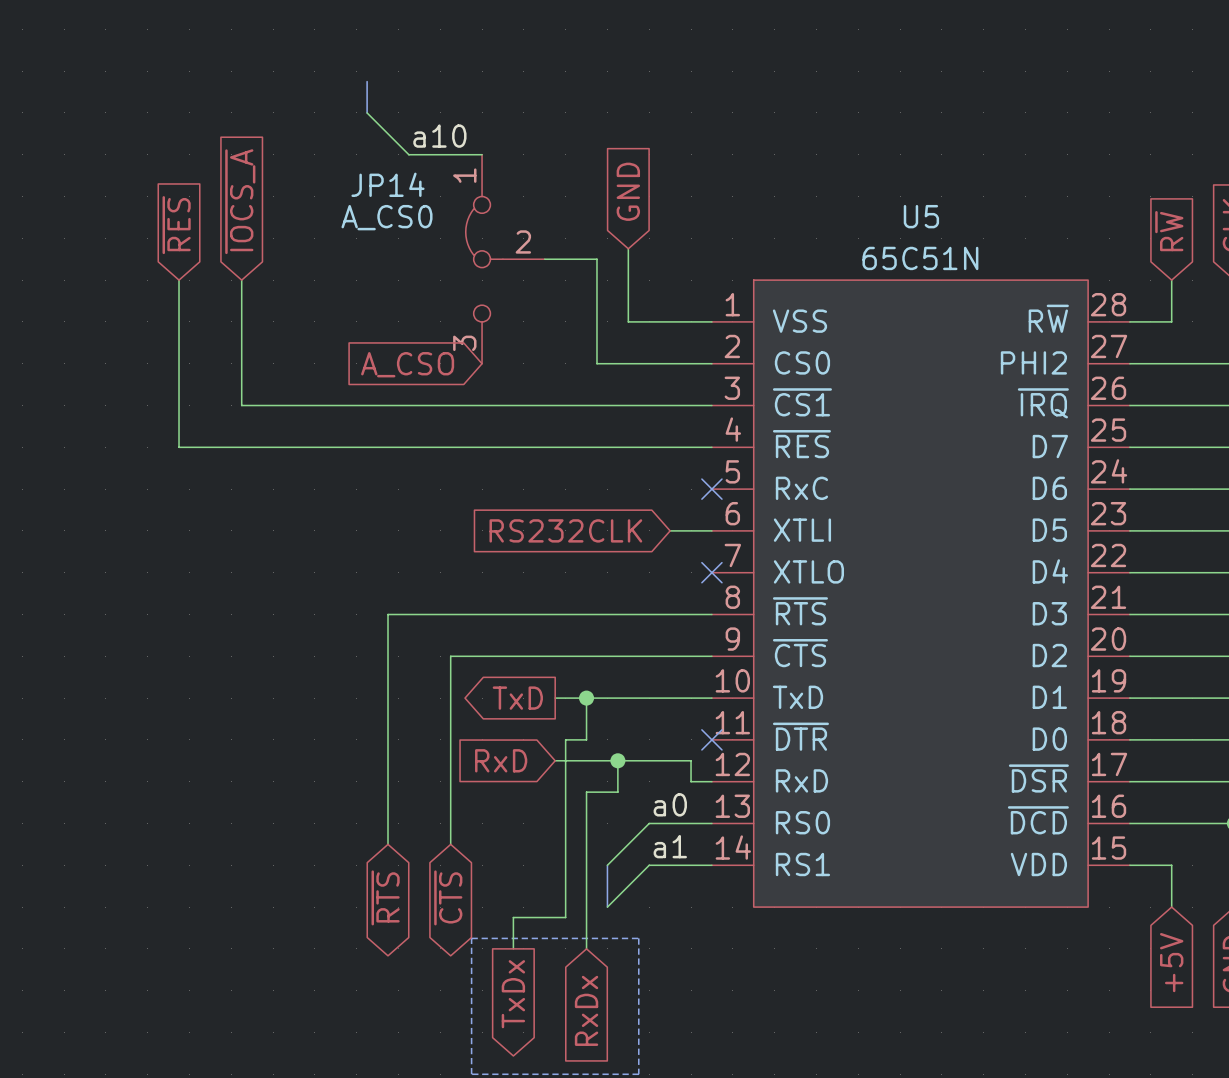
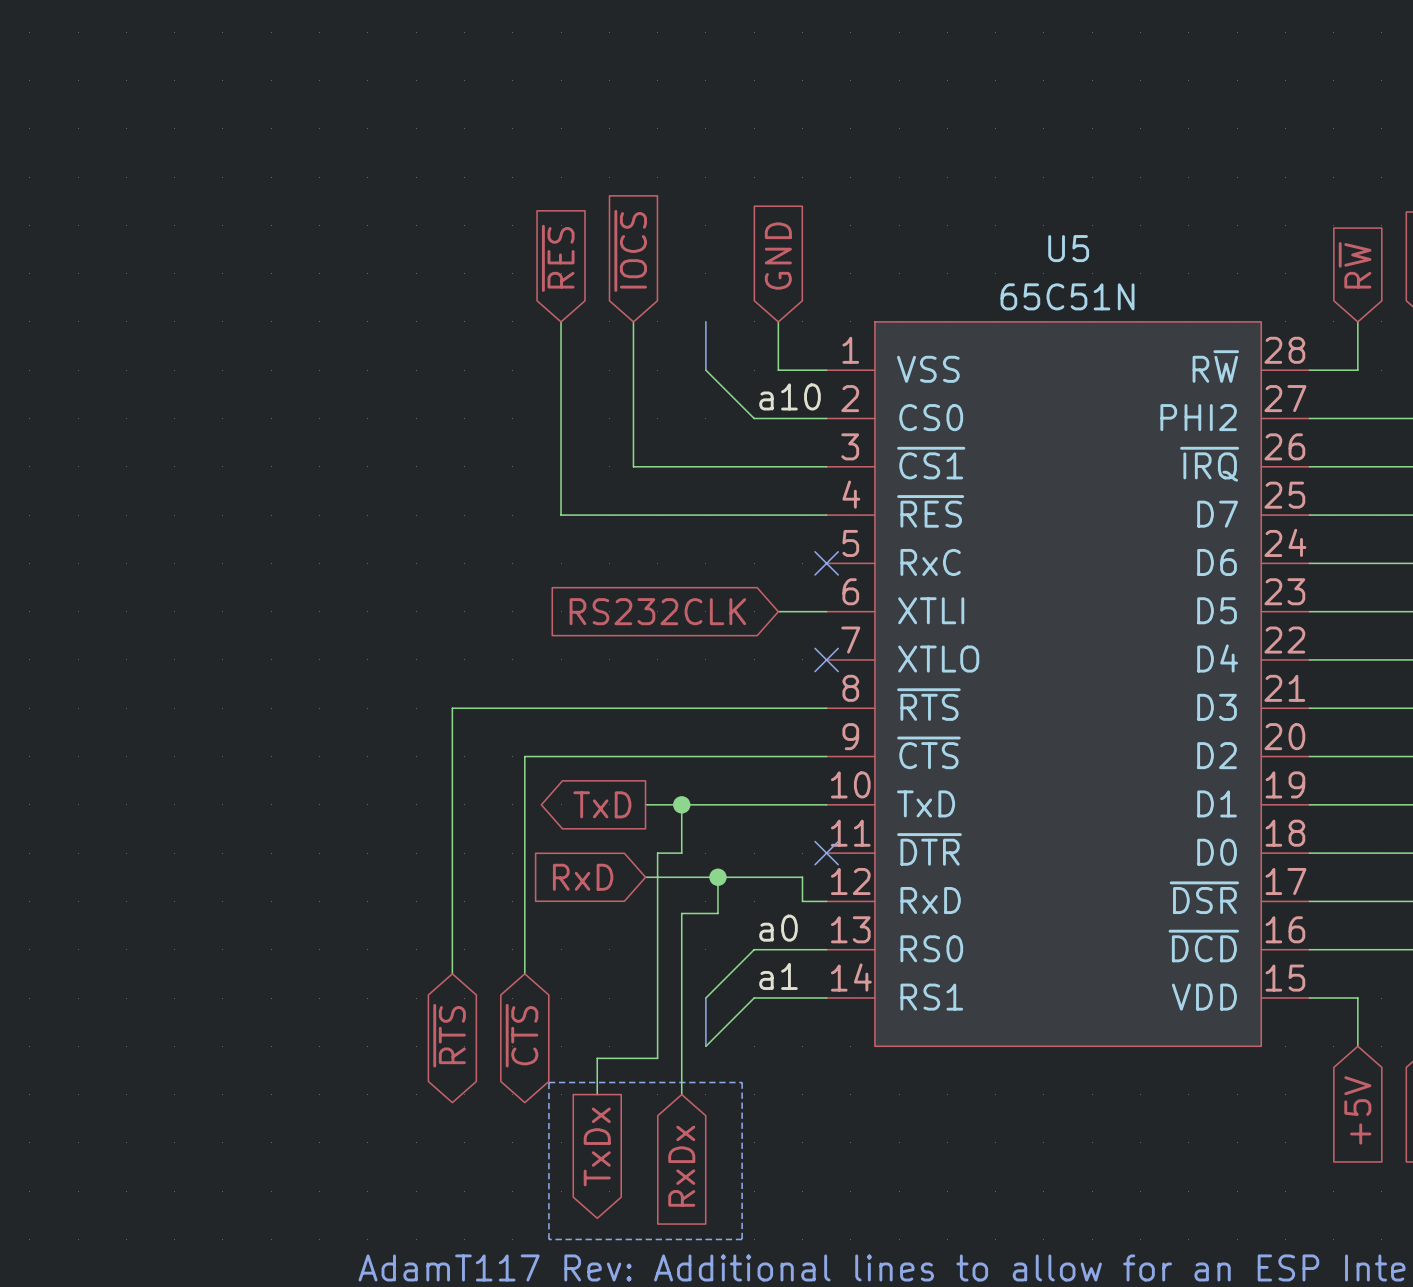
bus: (367, 81) (367, 112) -> none
wire: (367, 112) (408, 154) (482, 154) -> none
label position: a10 (439, 136) -> a10 (790, 396)
global label position: GND (628, 191) -> GND (778, 256)
global label: ~{IOCS_A} (240, 201) -> none
global label: none -> ~{IOCS} (630, 250)
global label position: ~{RES} (176, 225) -> ~{RES} (558, 258)
wire: (628, 248) (628, 321) (670, 321) -> (778, 321) (778, 370)
JP14: A_CS0 (505, 259) -> none
wire: (544, 259) (596, 259) (596, 363) (649, 363) -> (705, 370) (754, 418)
wire: (179, 280) (179, 447) (482, 447) -> (561, 321) (561, 515)
wire: (241, 280) (241, 405) (544, 405) -> (633, 321) (633, 466)
bus: none -> (705, 321) (705, 370)
global label: A_CSO (407, 364) -> none

